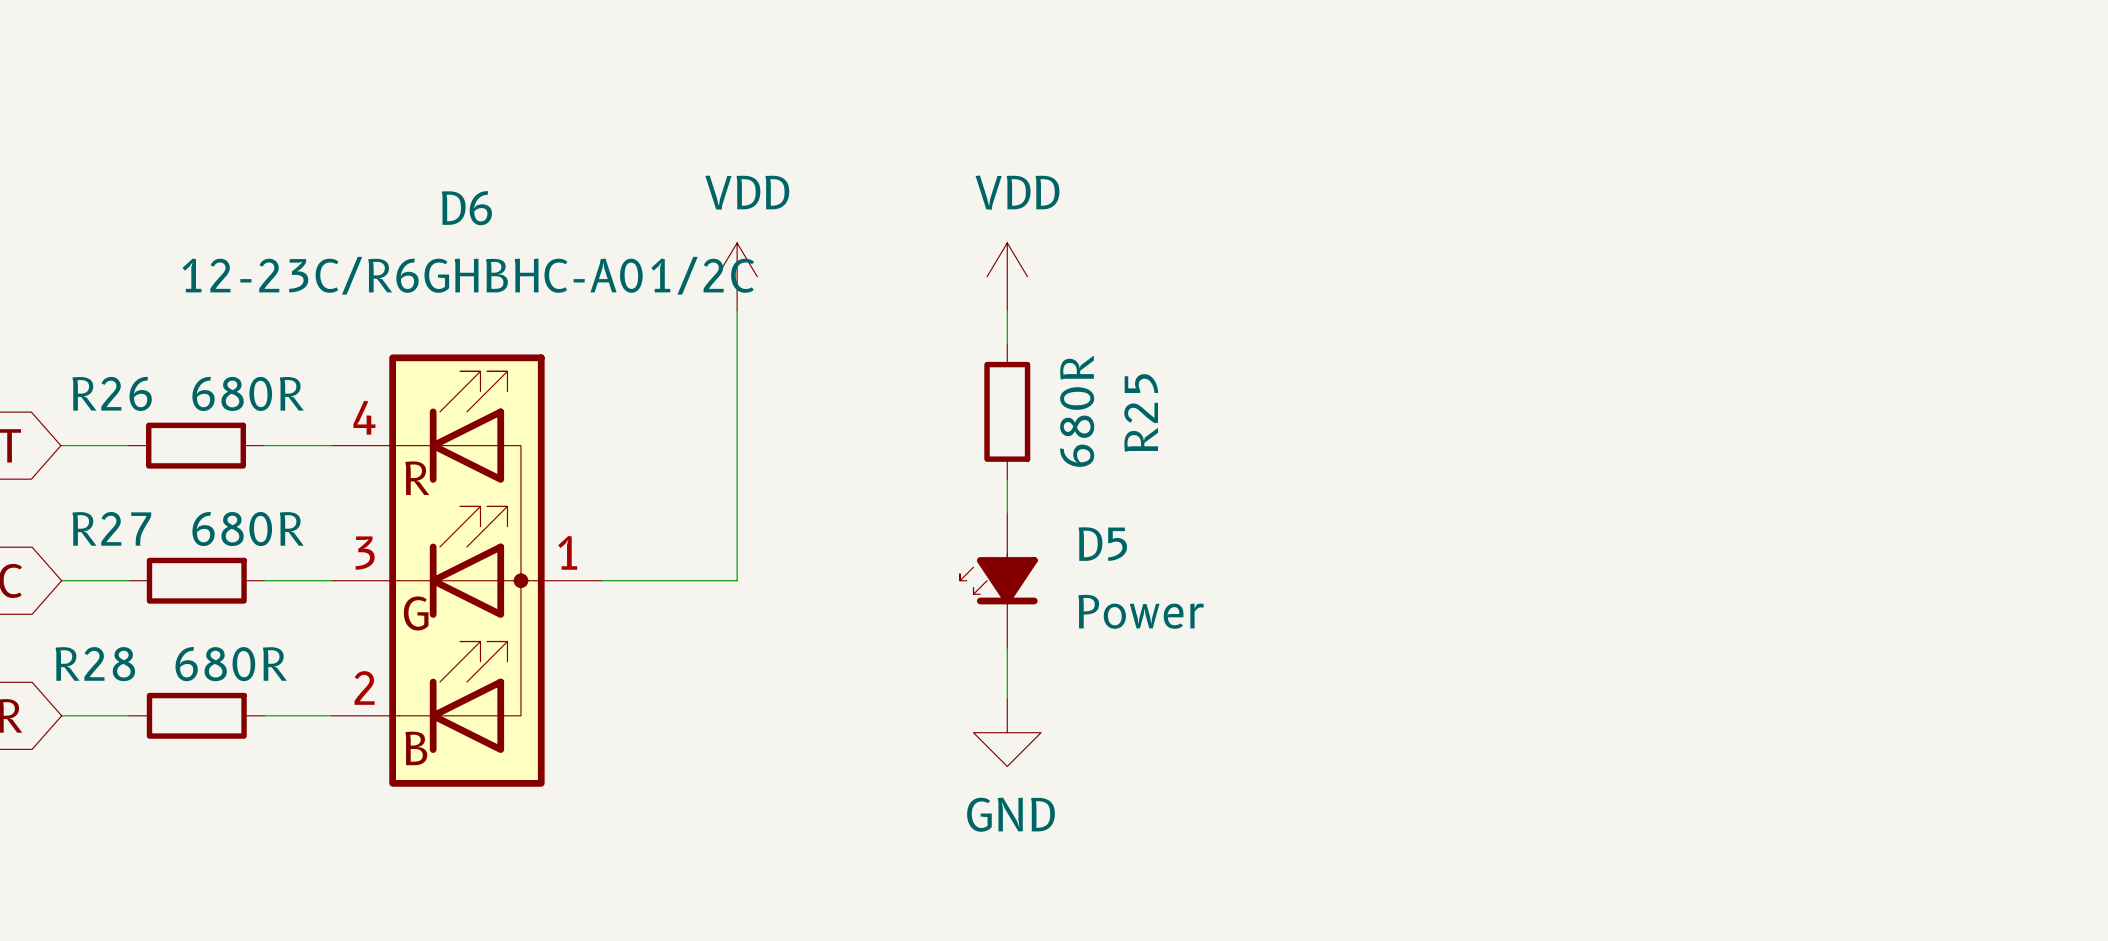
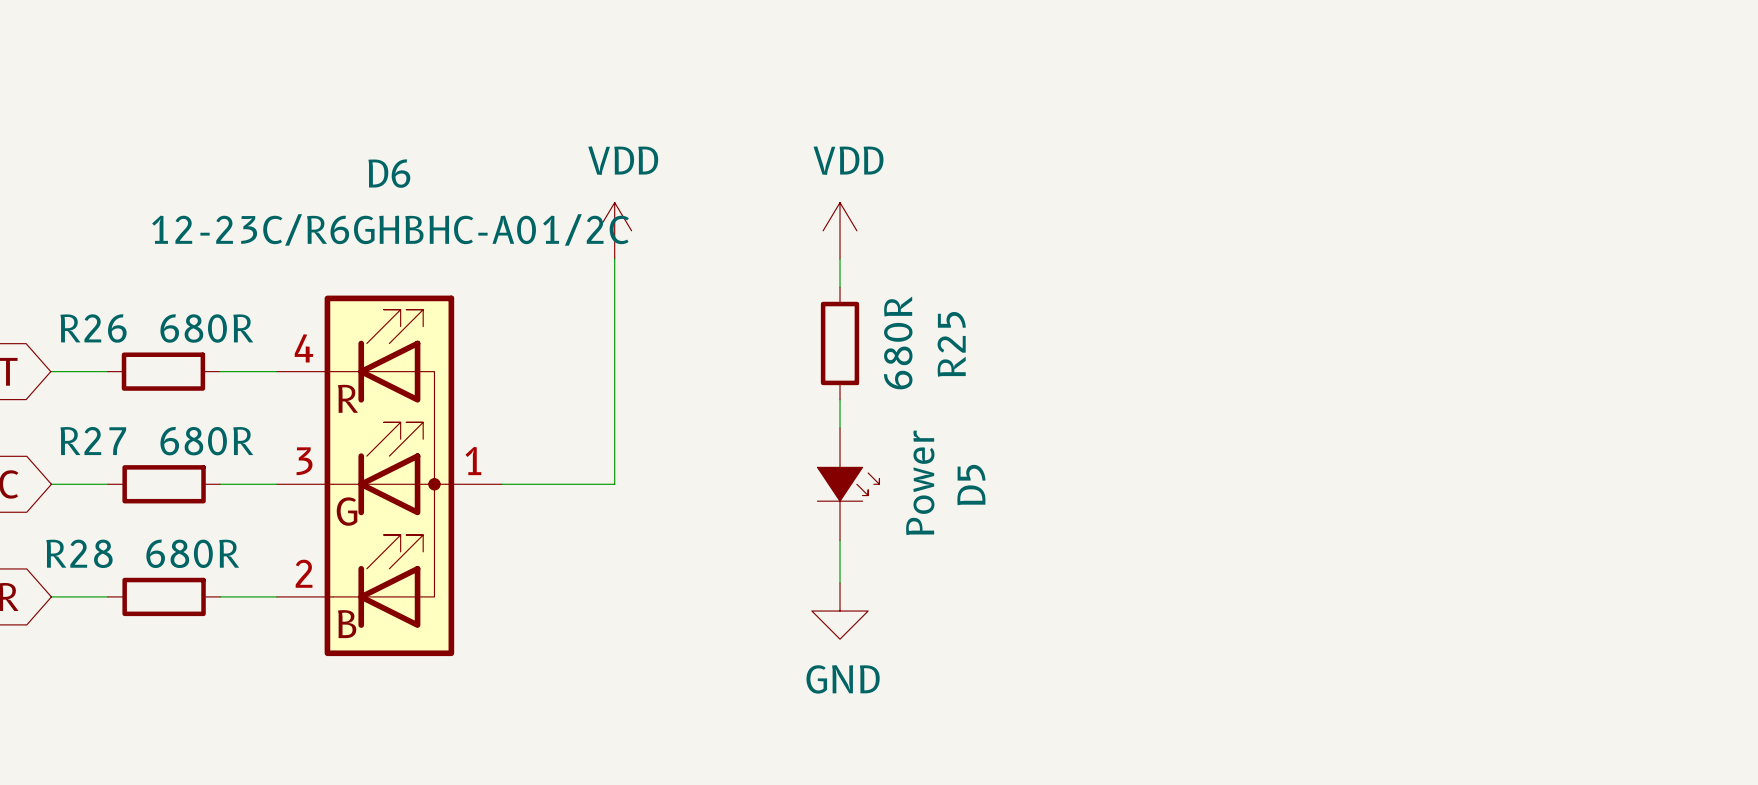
D5 symbol: [960, 513, 1038, 649] -> [817, 427, 880, 541]
D5 value position: Power (1140, 611) -> Power (920, 482)

